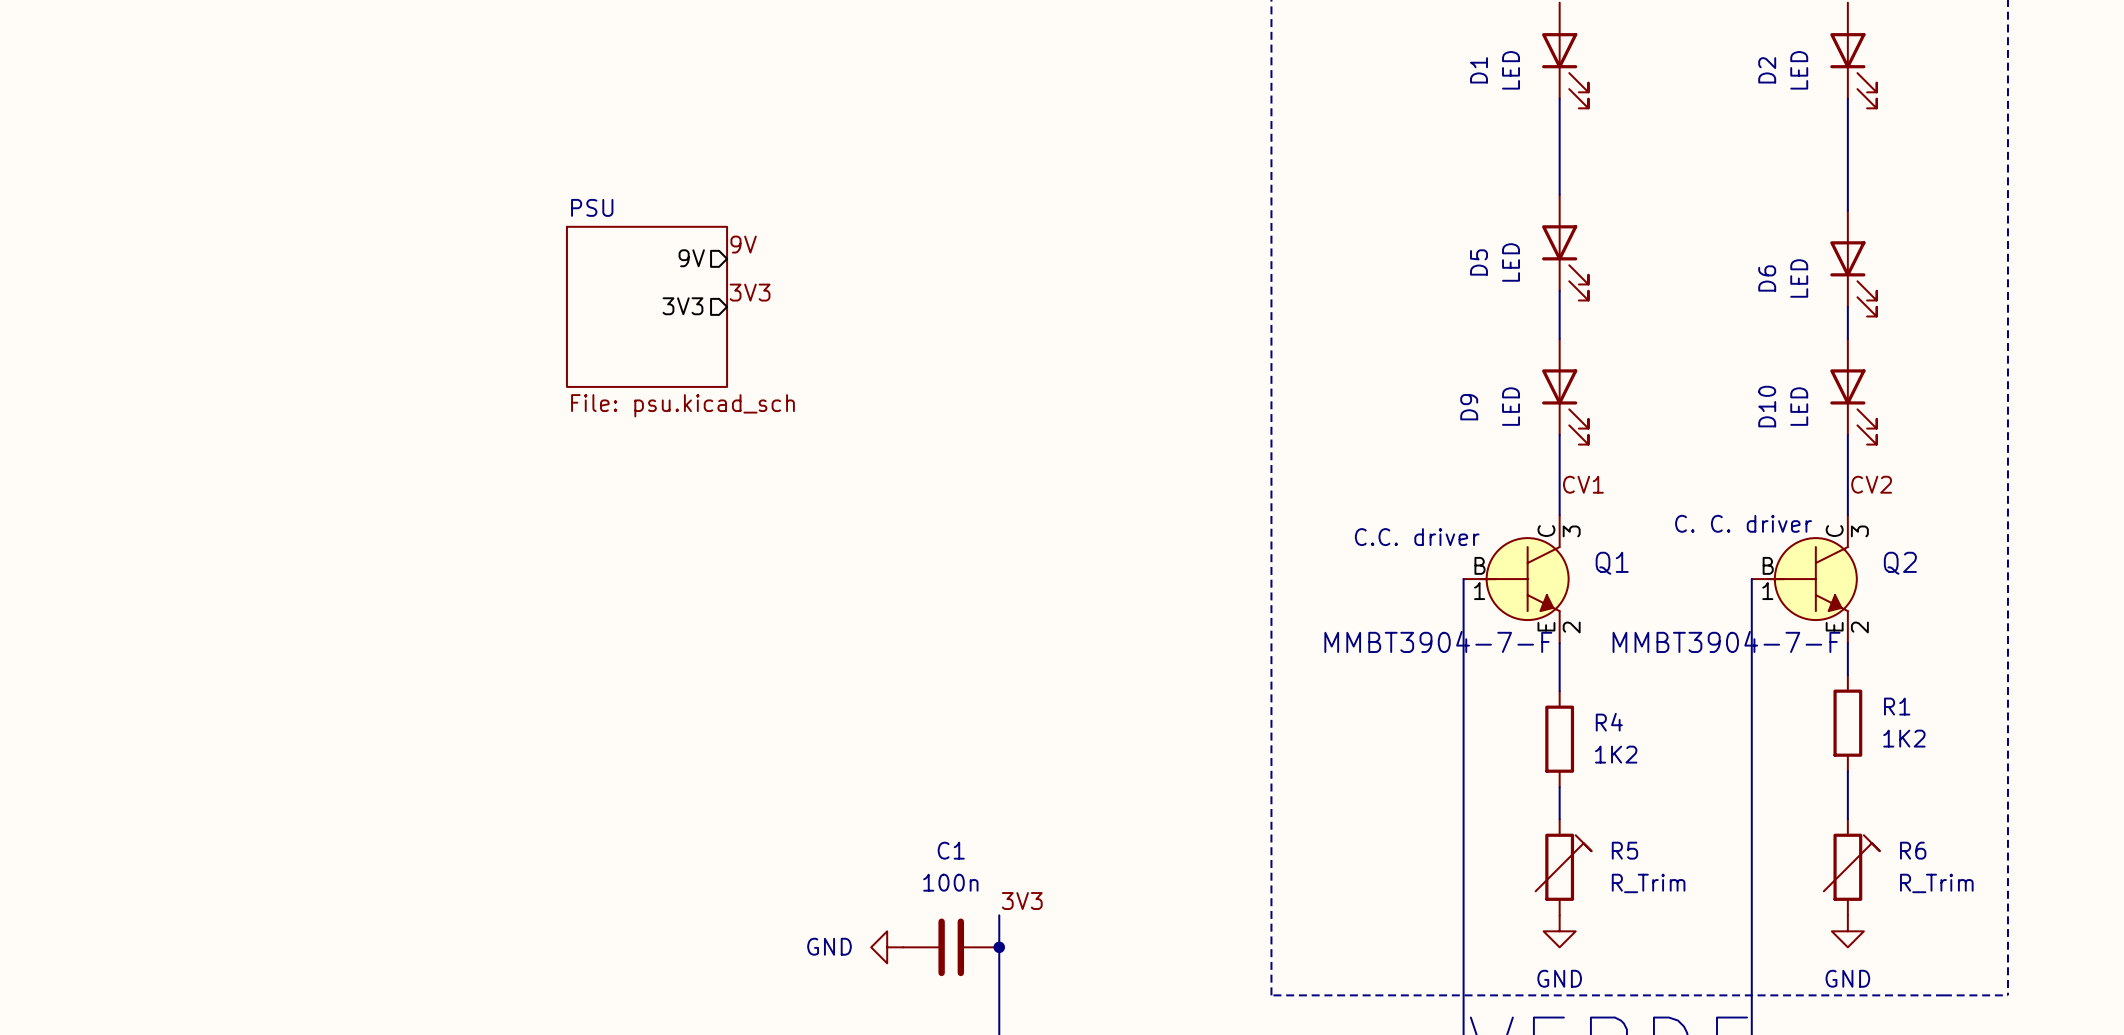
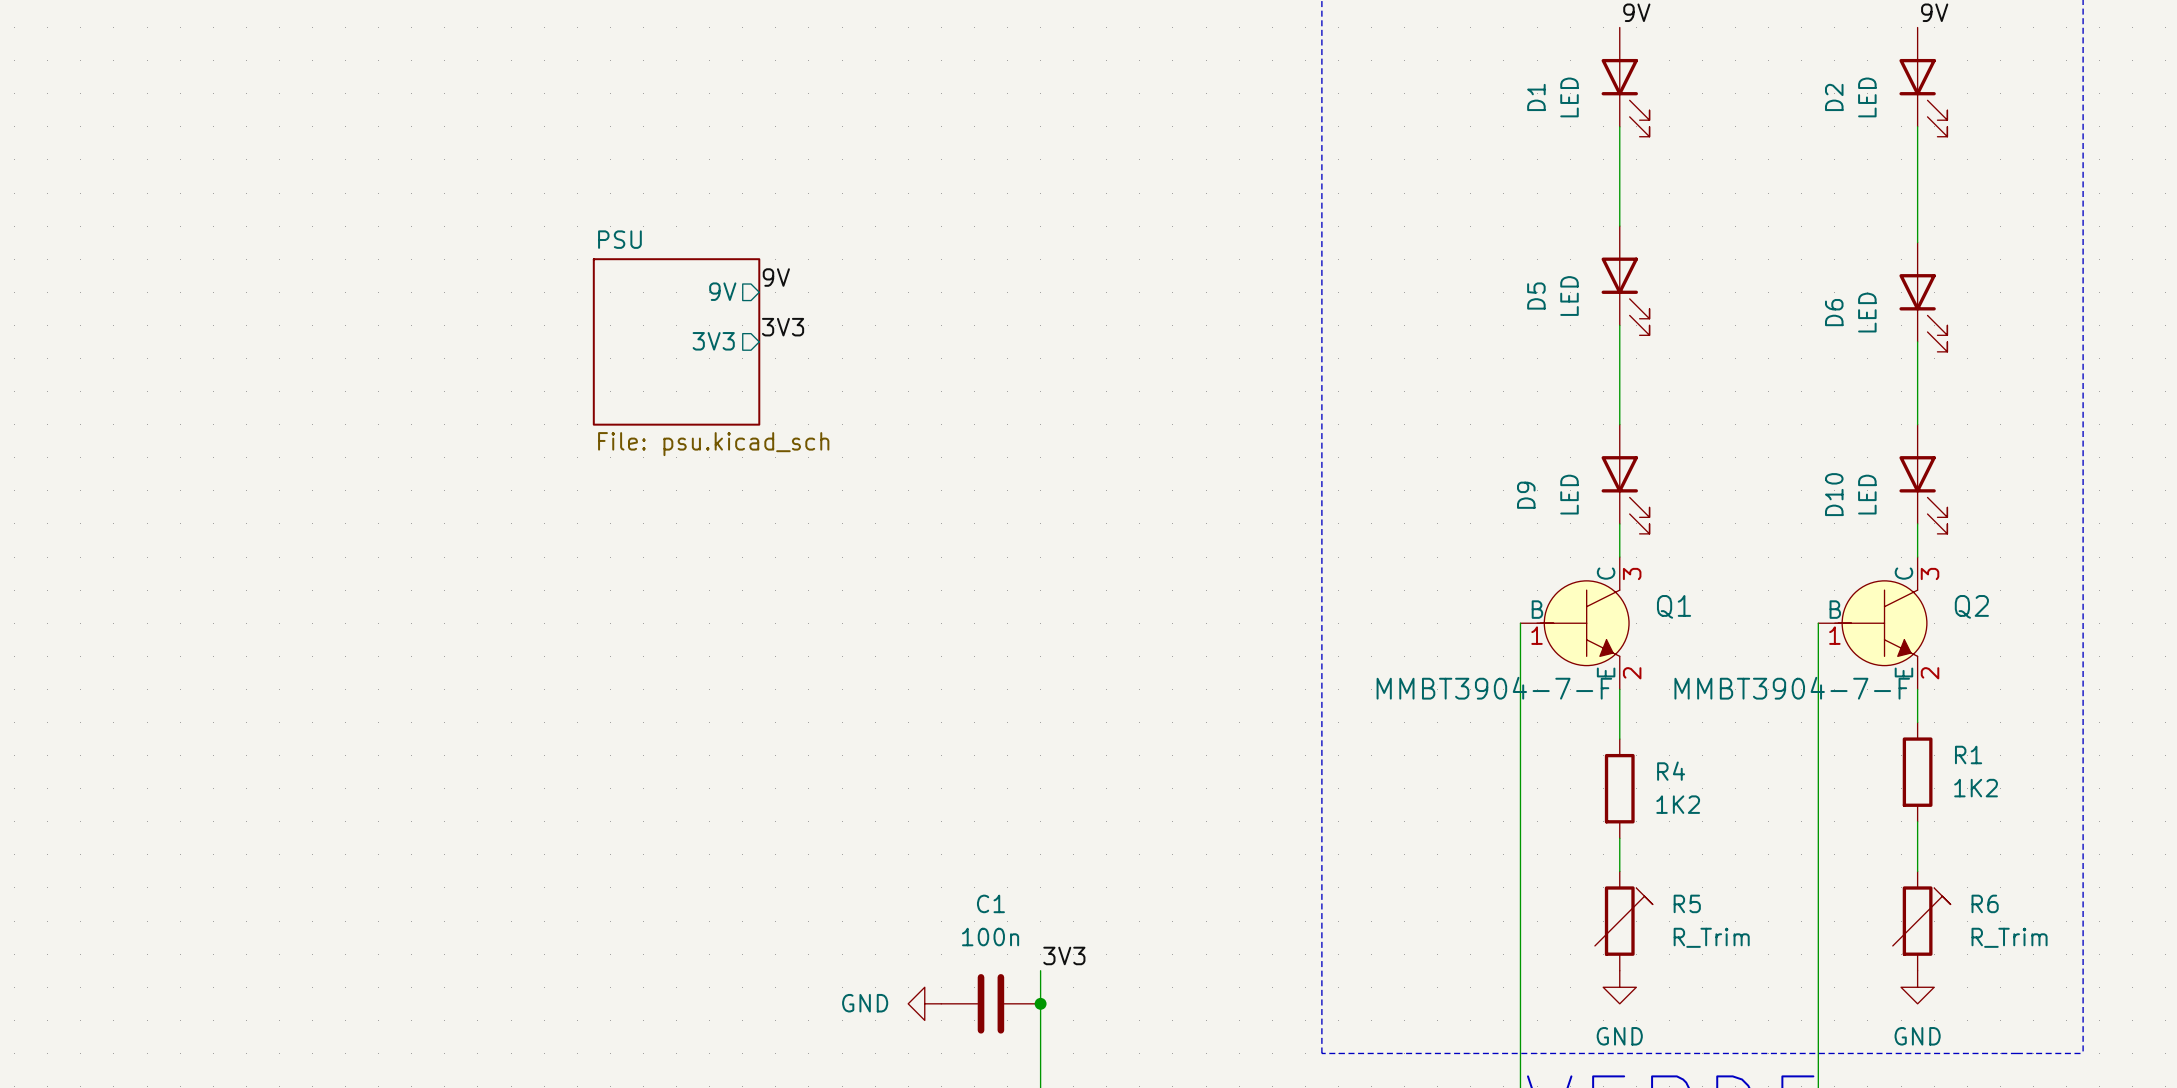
D9 position: (1565, 391) -> (1625, 479)
D10 position: (1853, 391) -> (1923, 479)
label: CV1 (1583, 484) -> none
label: CV2 (1871, 484) -> none
Q2 text: C. C. driver (1743, 523) -> none
Q1 text: C.C. driver (1417, 537) -> none

